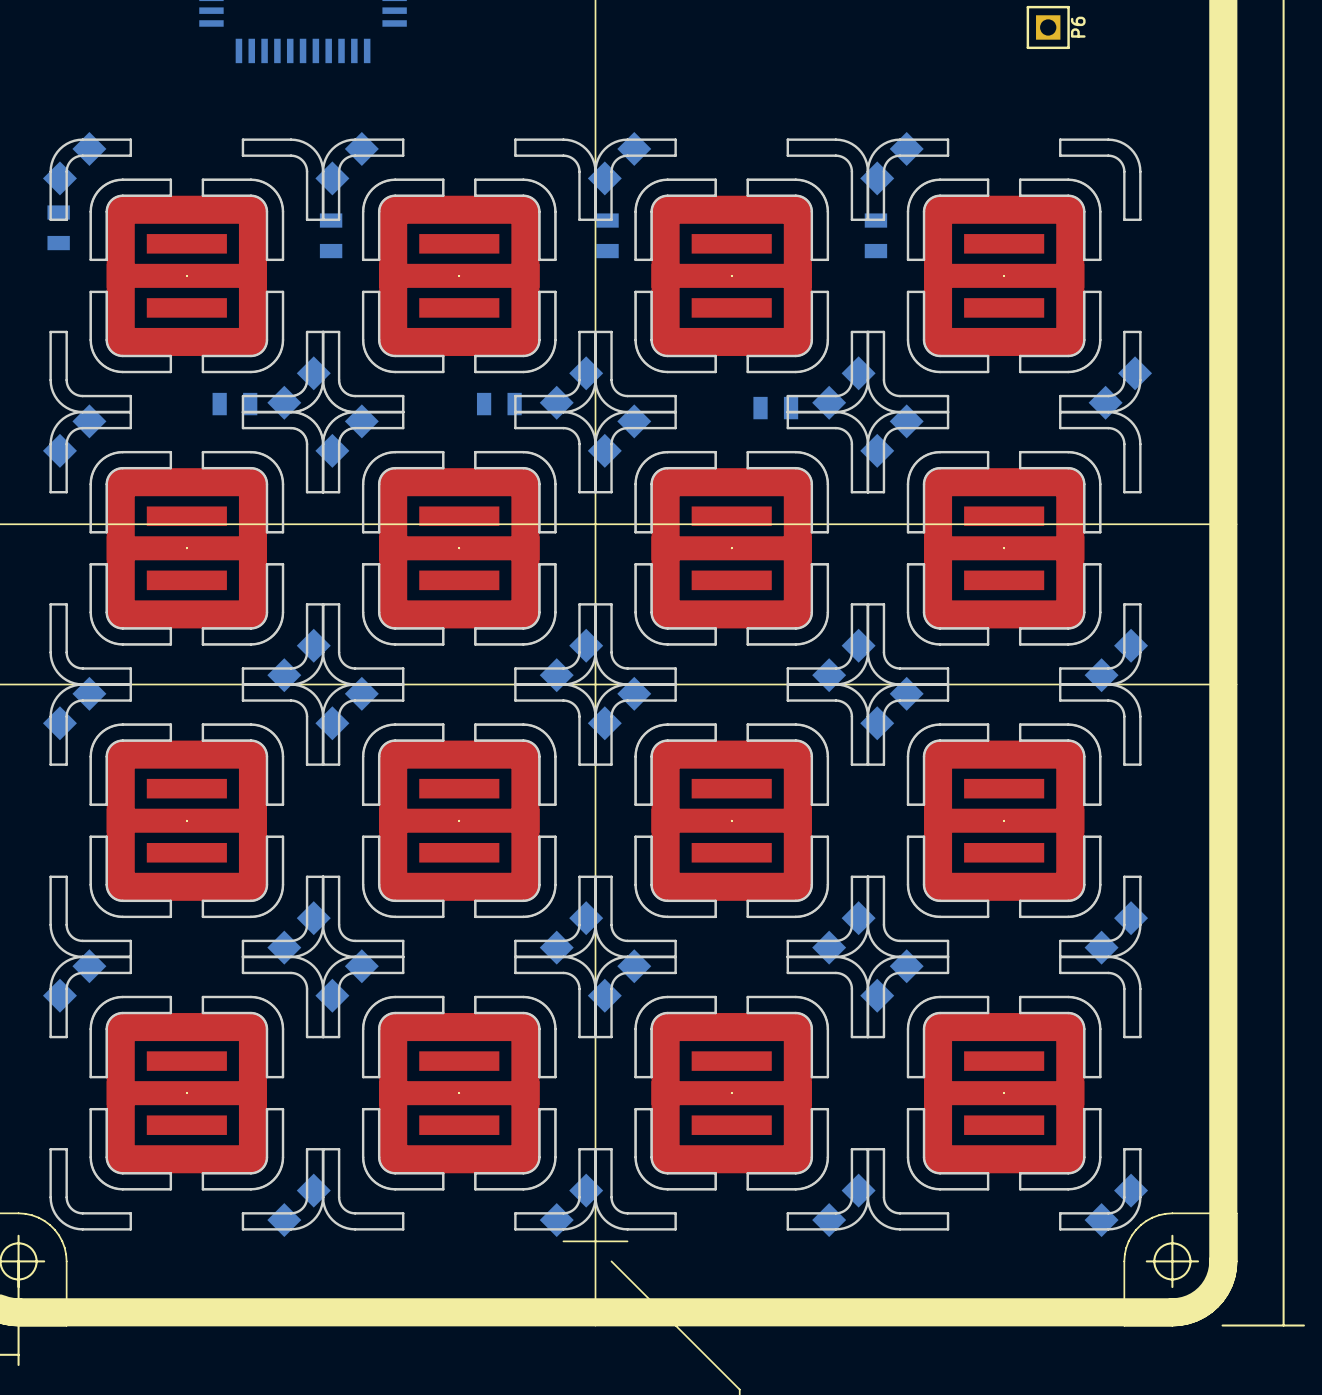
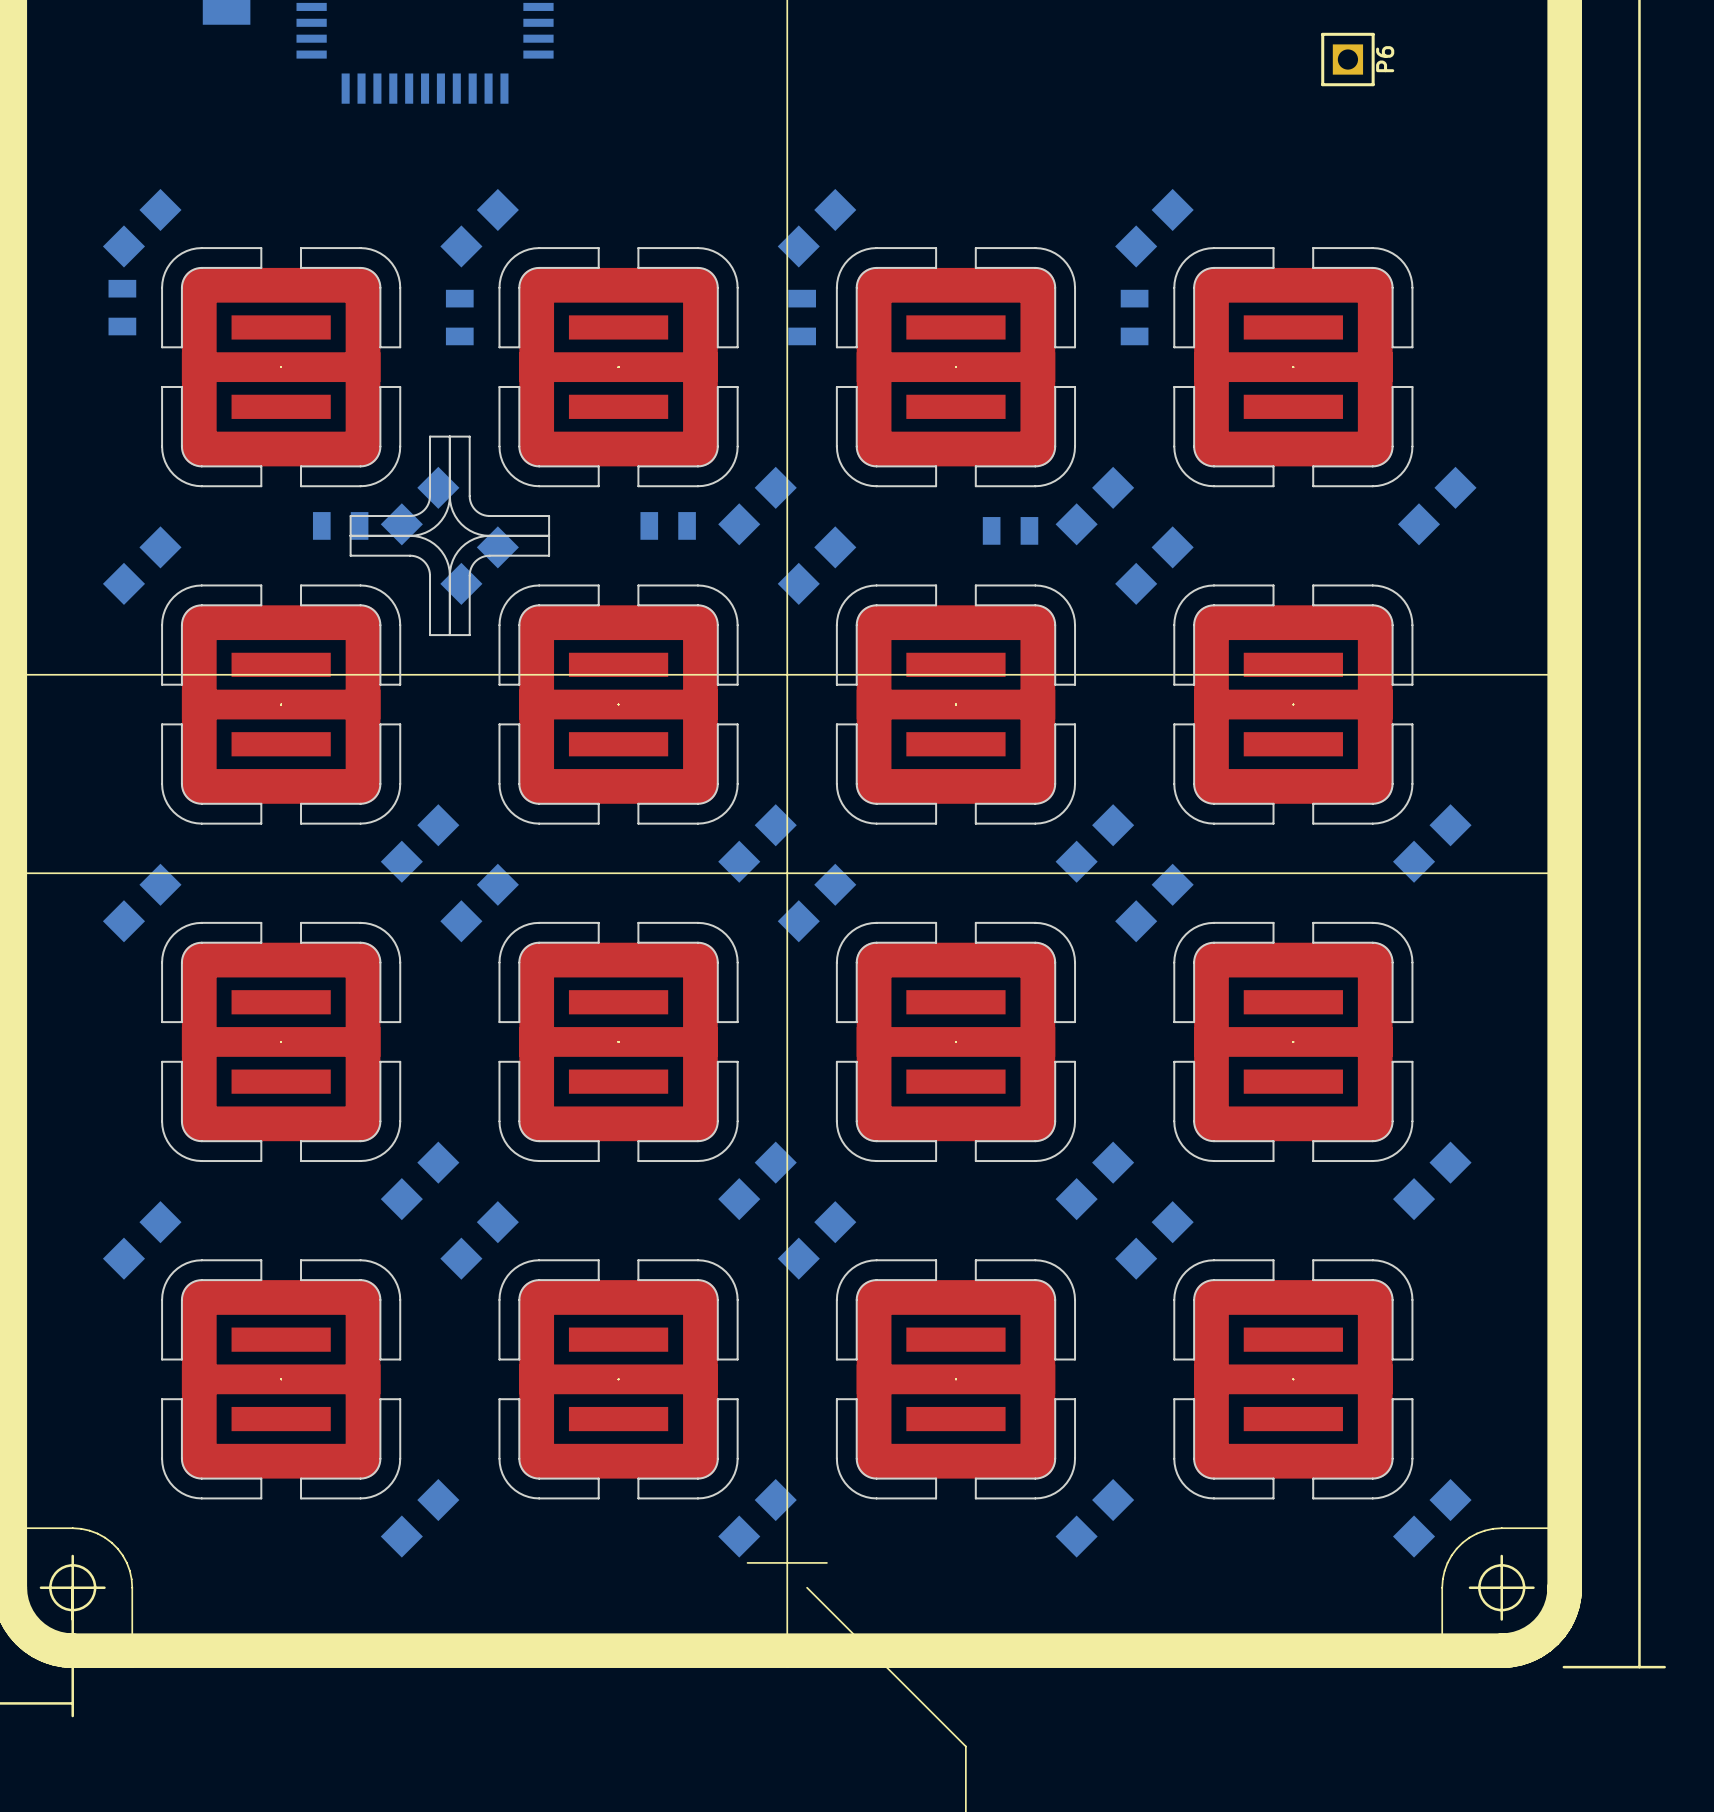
part footprint: [49, 138, 325, 414] -> [181, 267, 381, 467]
part footprint: [321, 138, 597, 414] -> [519, 267, 718, 467]
part footprint: [594, 138, 870, 414] -> [856, 267, 1056, 467]
part footprint: [866, 138, 1142, 414] -> [1194, 267, 1393, 467]
part footprint: [49, 410, 325, 686] -> [181, 605, 381, 804]
part footprint: [321, 410, 597, 686] -> [519, 605, 718, 804]
part footprint: [594, 410, 870, 686] -> [856, 605, 1056, 804]
part footprint: [866, 410, 1142, 686] -> [1194, 605, 1393, 804]
part footprint: [49, 683, 325, 959] -> [181, 942, 381, 1142]
part footprint: [321, 683, 597, 959] -> [519, 942, 718, 1142]
part footprint: [594, 683, 870, 959] -> [856, 942, 1056, 1142]
part footprint: [866, 683, 1142, 959] -> [1194, 942, 1393, 1142]
part footprint: [49, 955, 325, 1231] -> [181, 1280, 381, 1479]
part footprint: [321, 955, 597, 1231] -> [519, 1280, 718, 1479]
part footprint: [594, 955, 870, 1231] -> [856, 1280, 1056, 1479]
part footprint: [866, 955, 1142, 1231] -> [1194, 1280, 1393, 1479]

